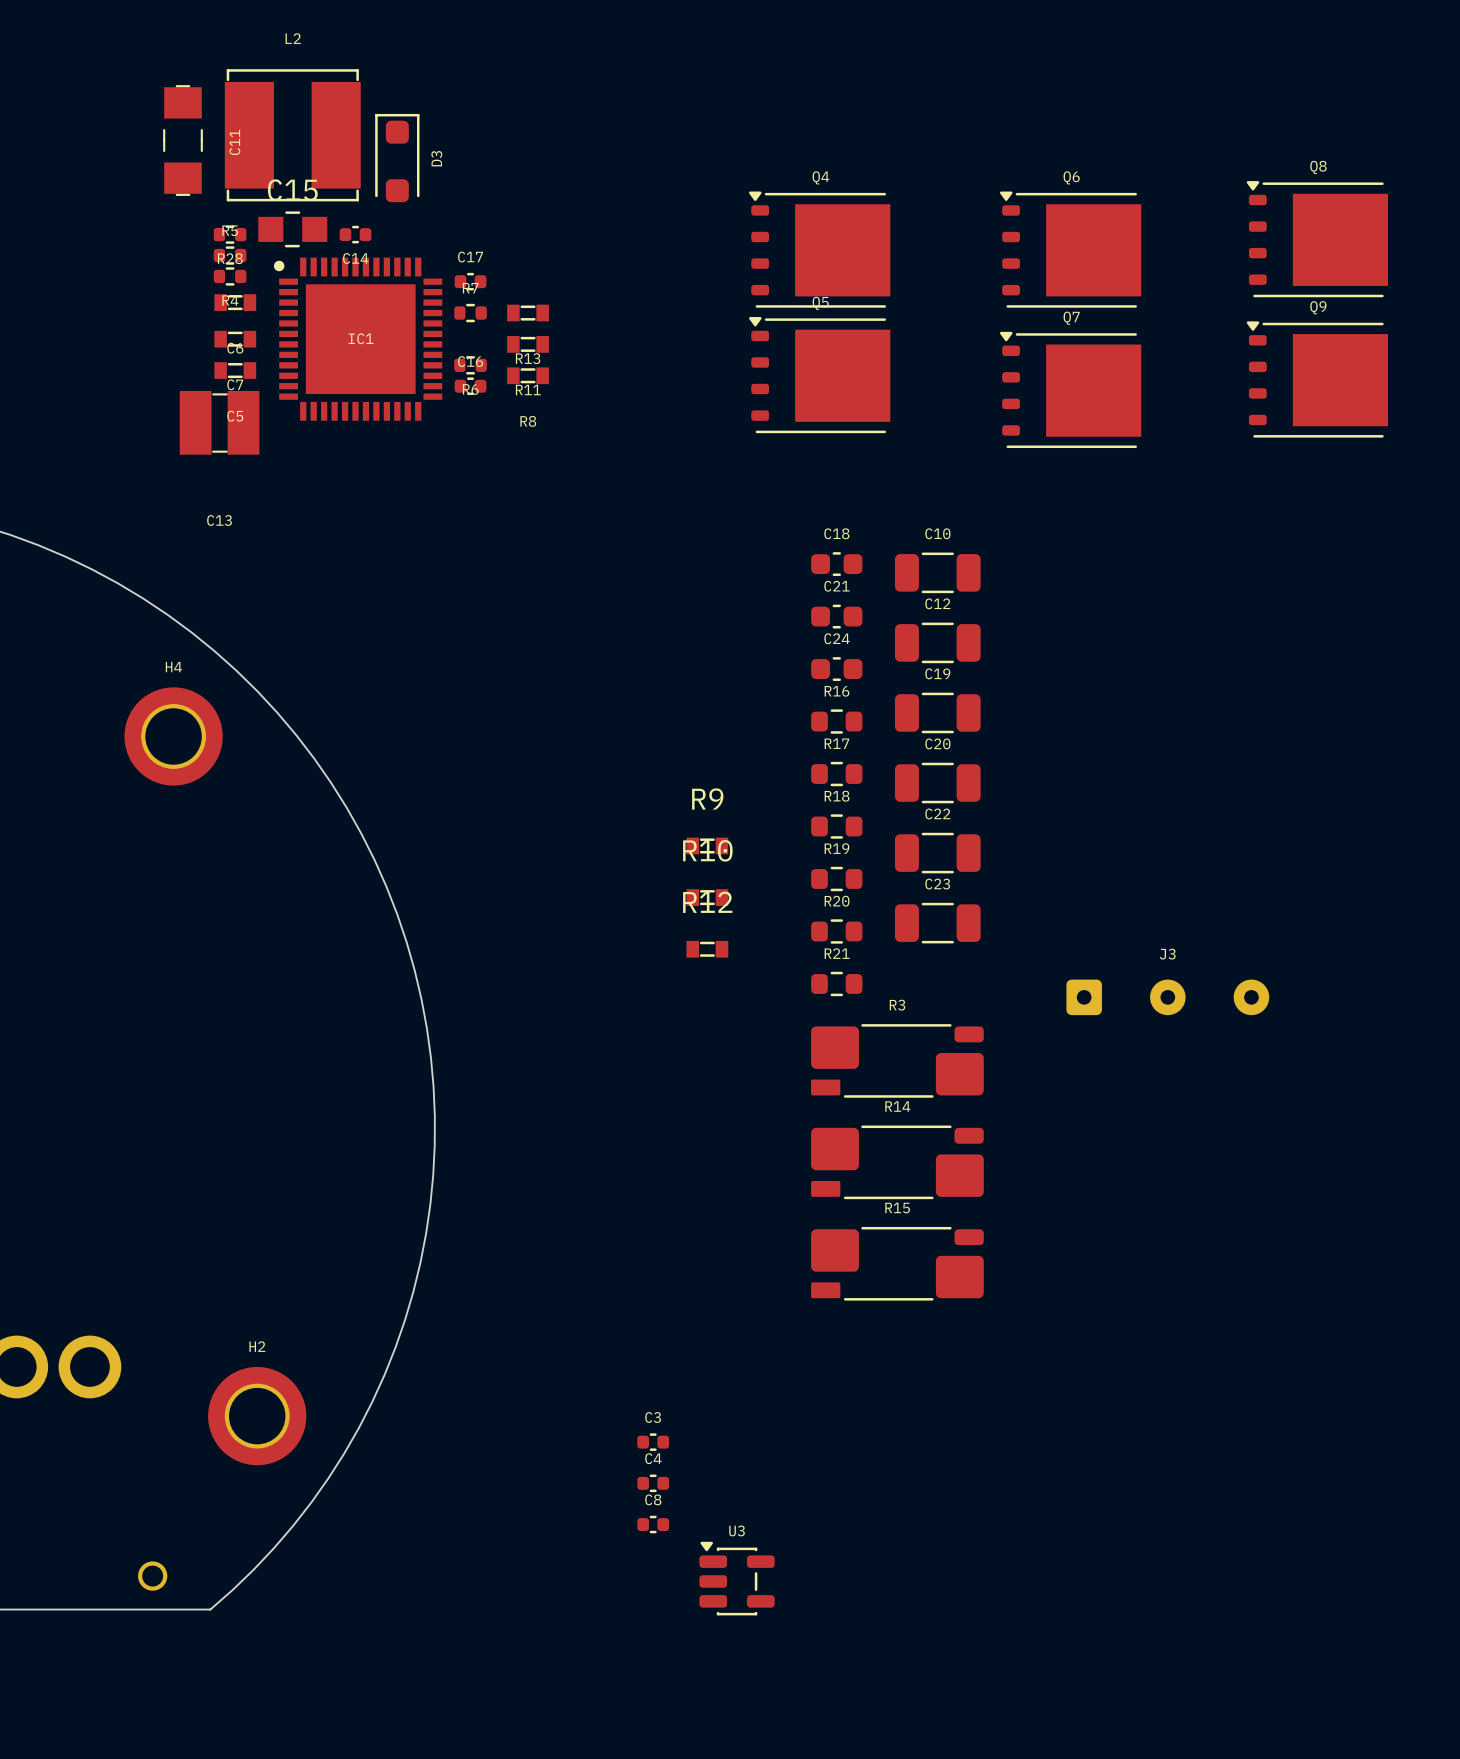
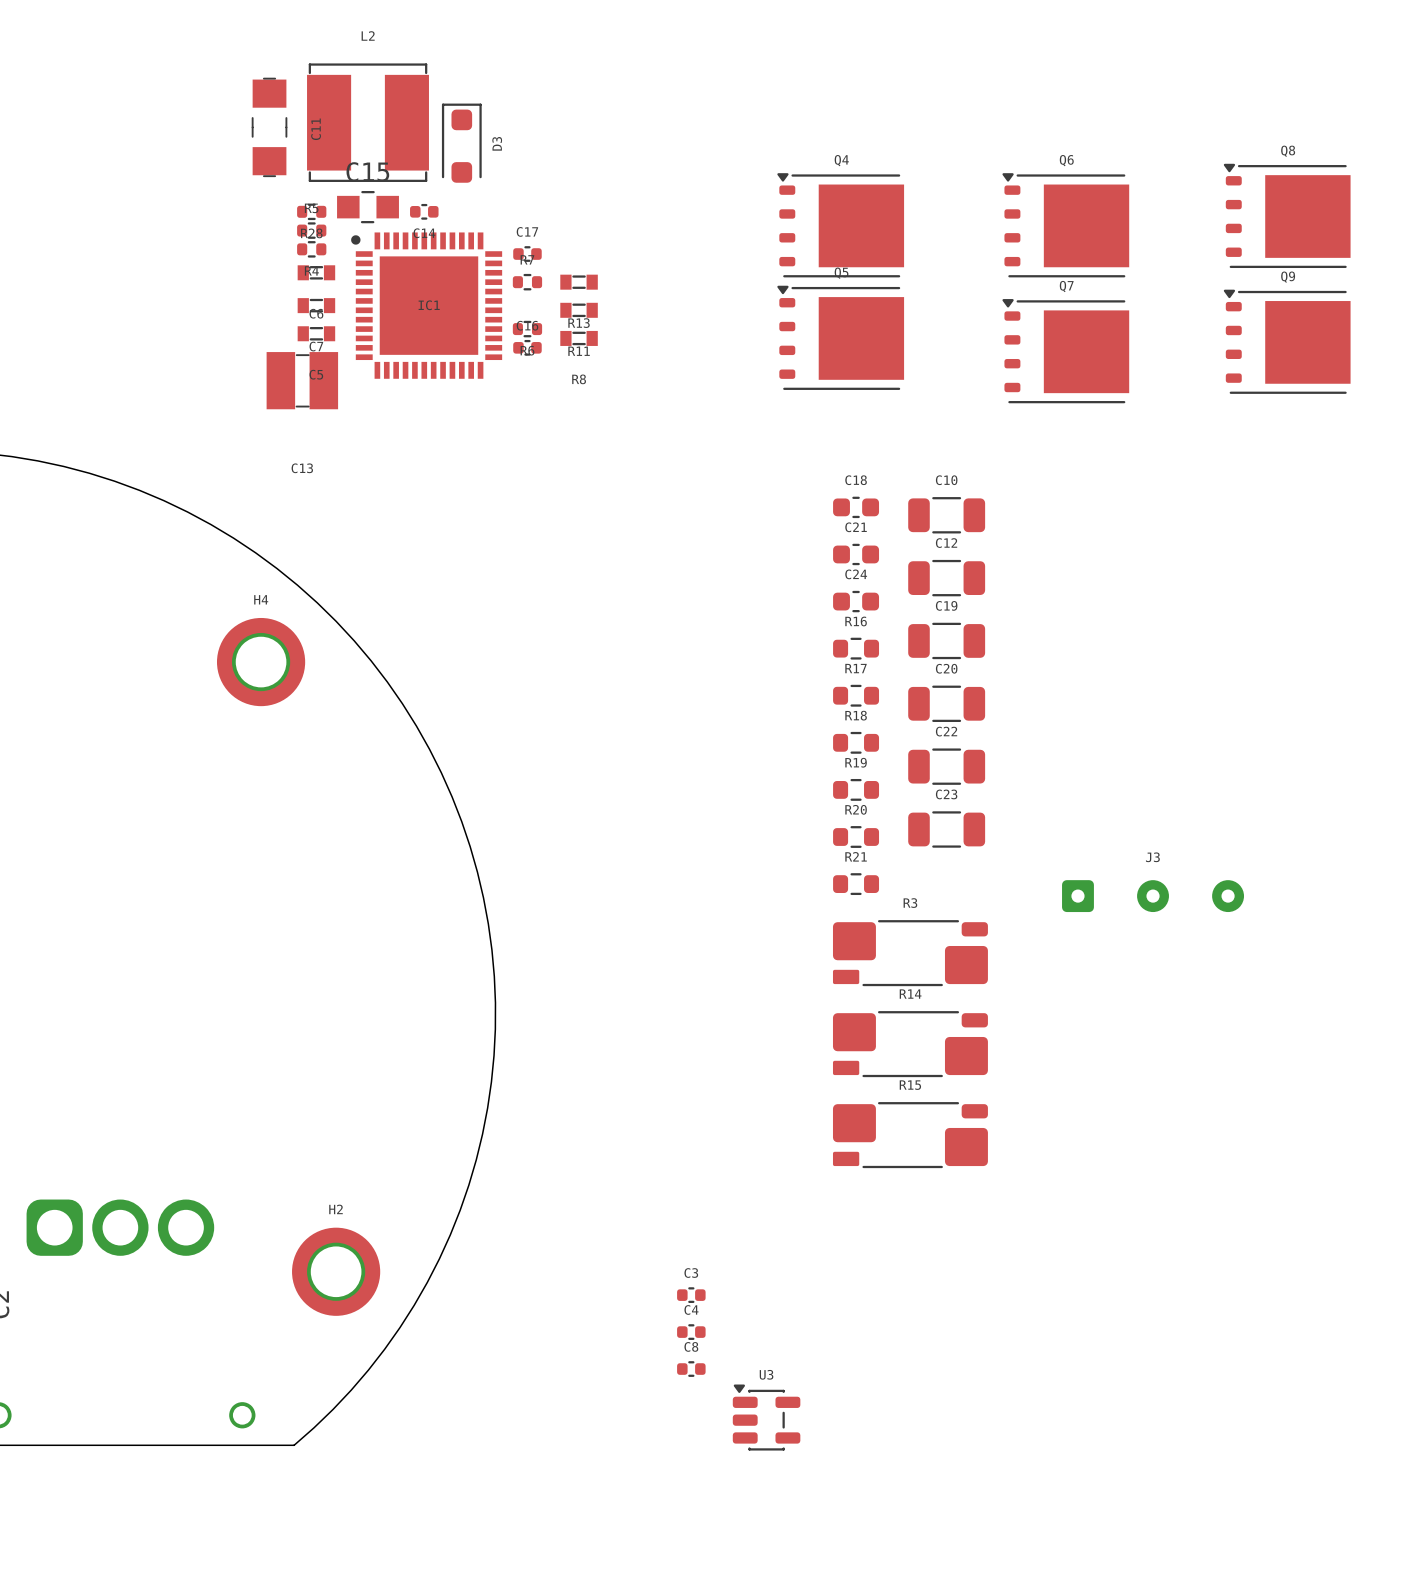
R9: (707, 845) -> none
R10: (707, 897) -> none
R12: (707, 949) -> none

